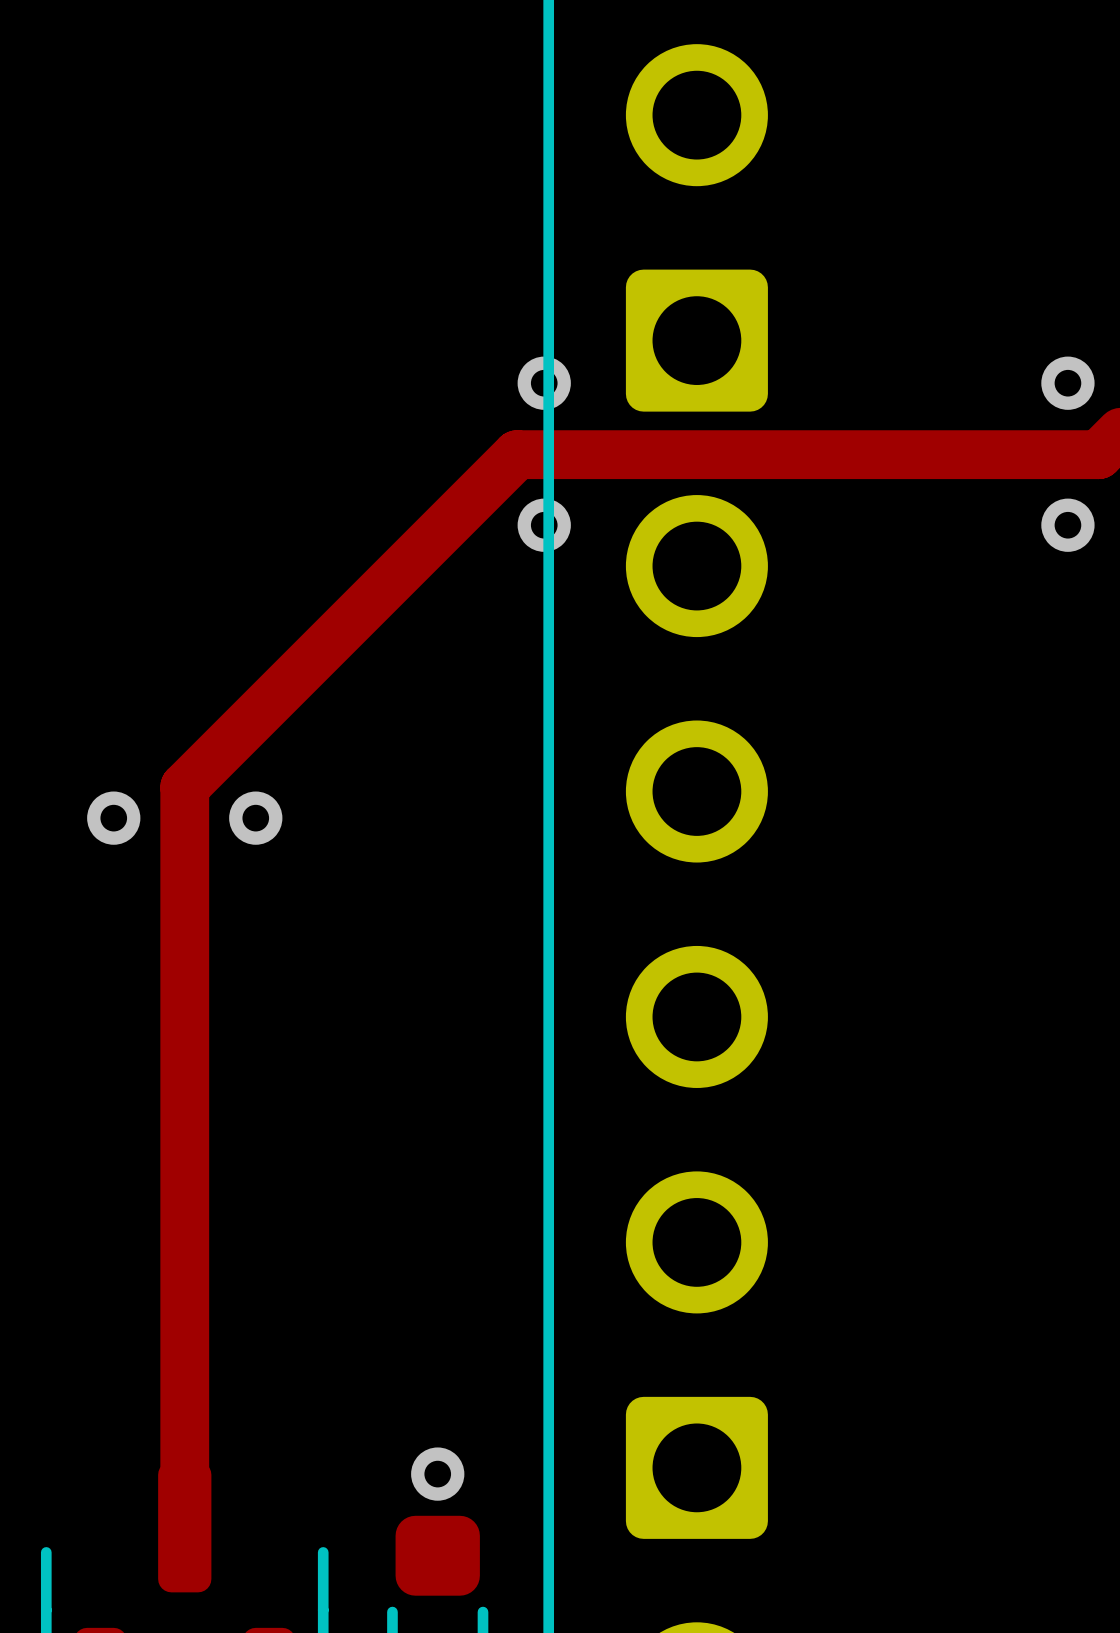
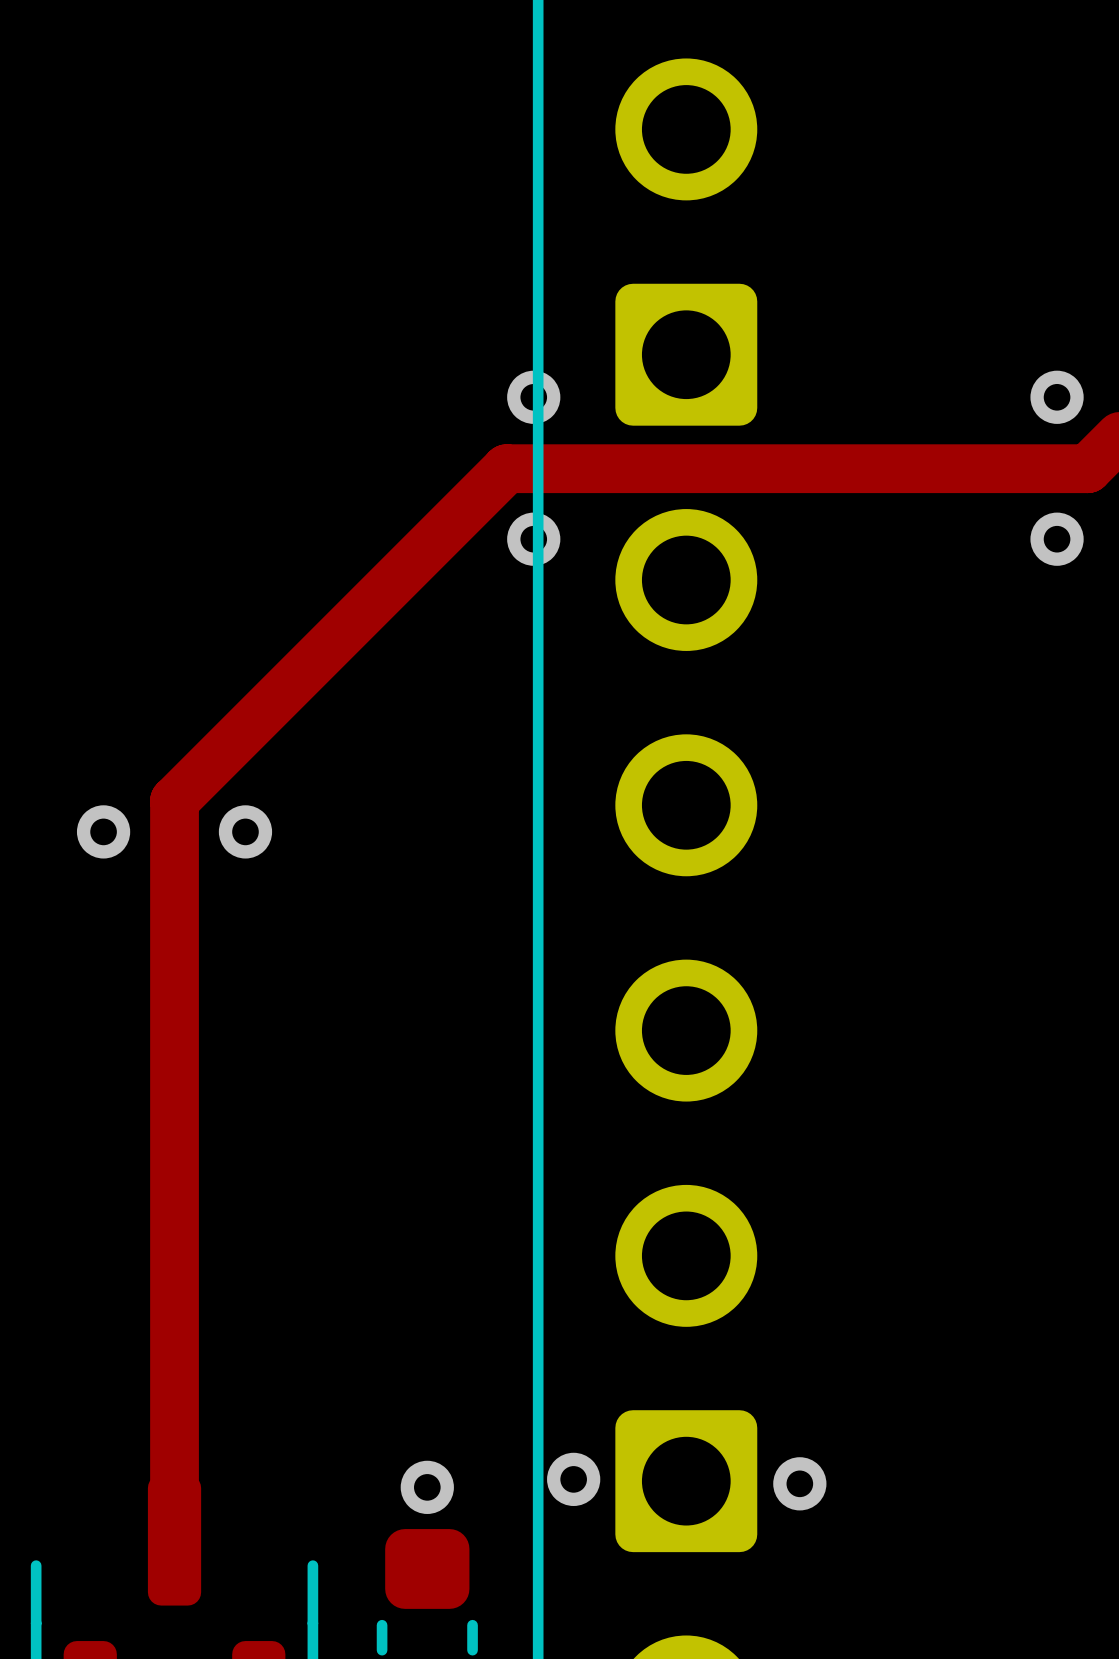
via: none -> (573, 1479)
via: none -> (799, 1483)

